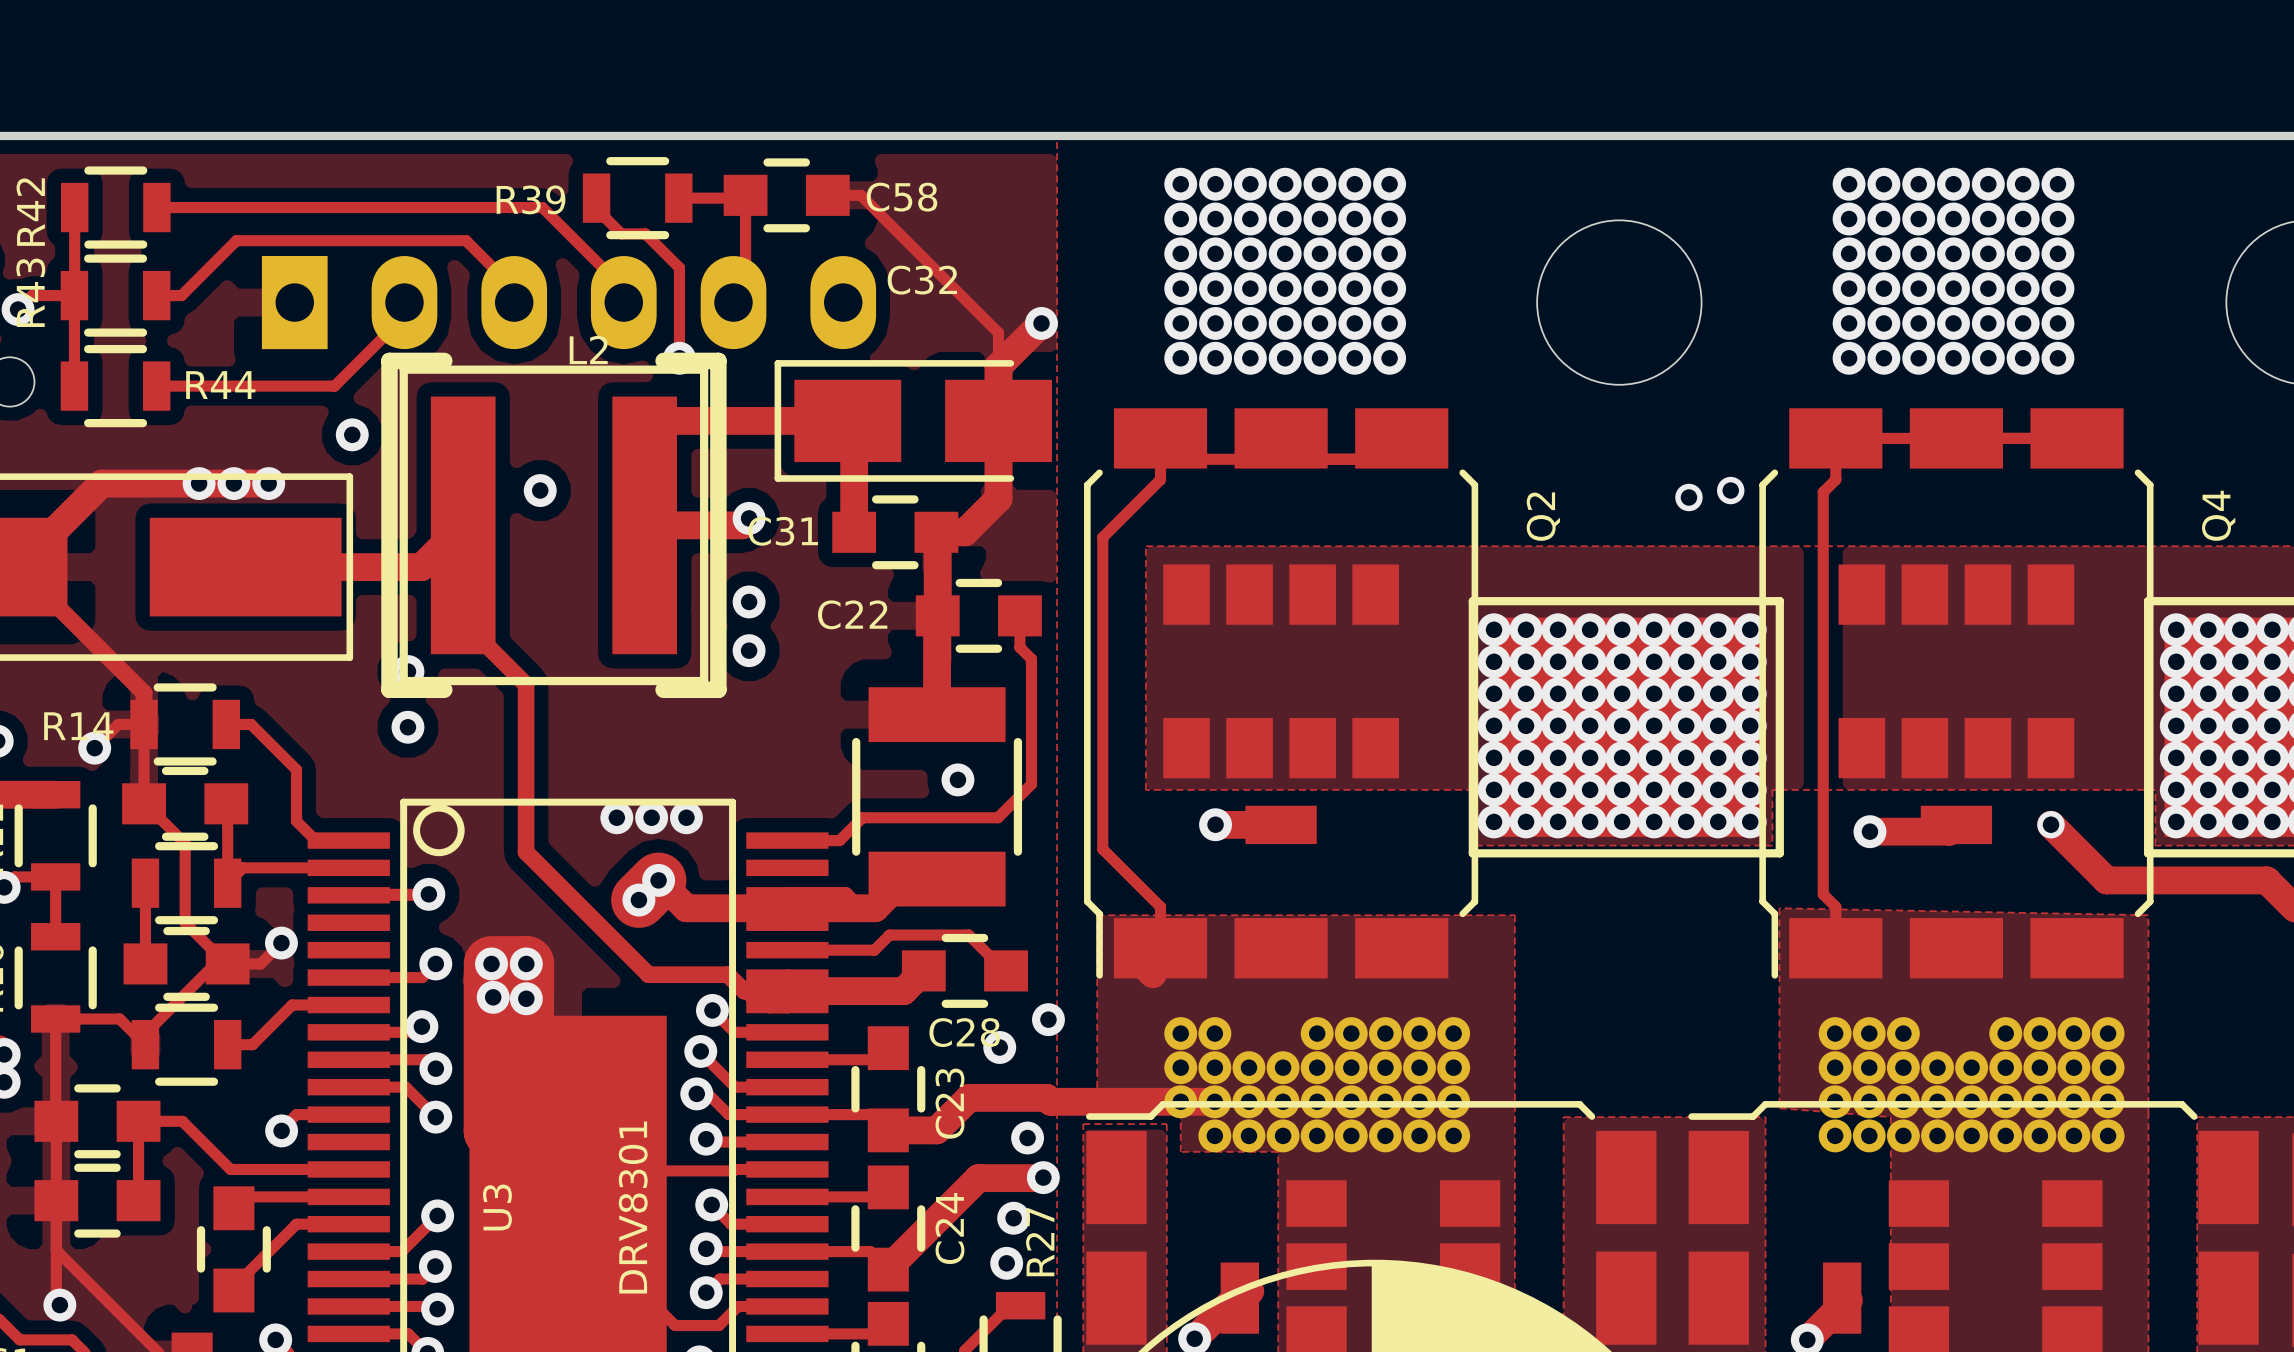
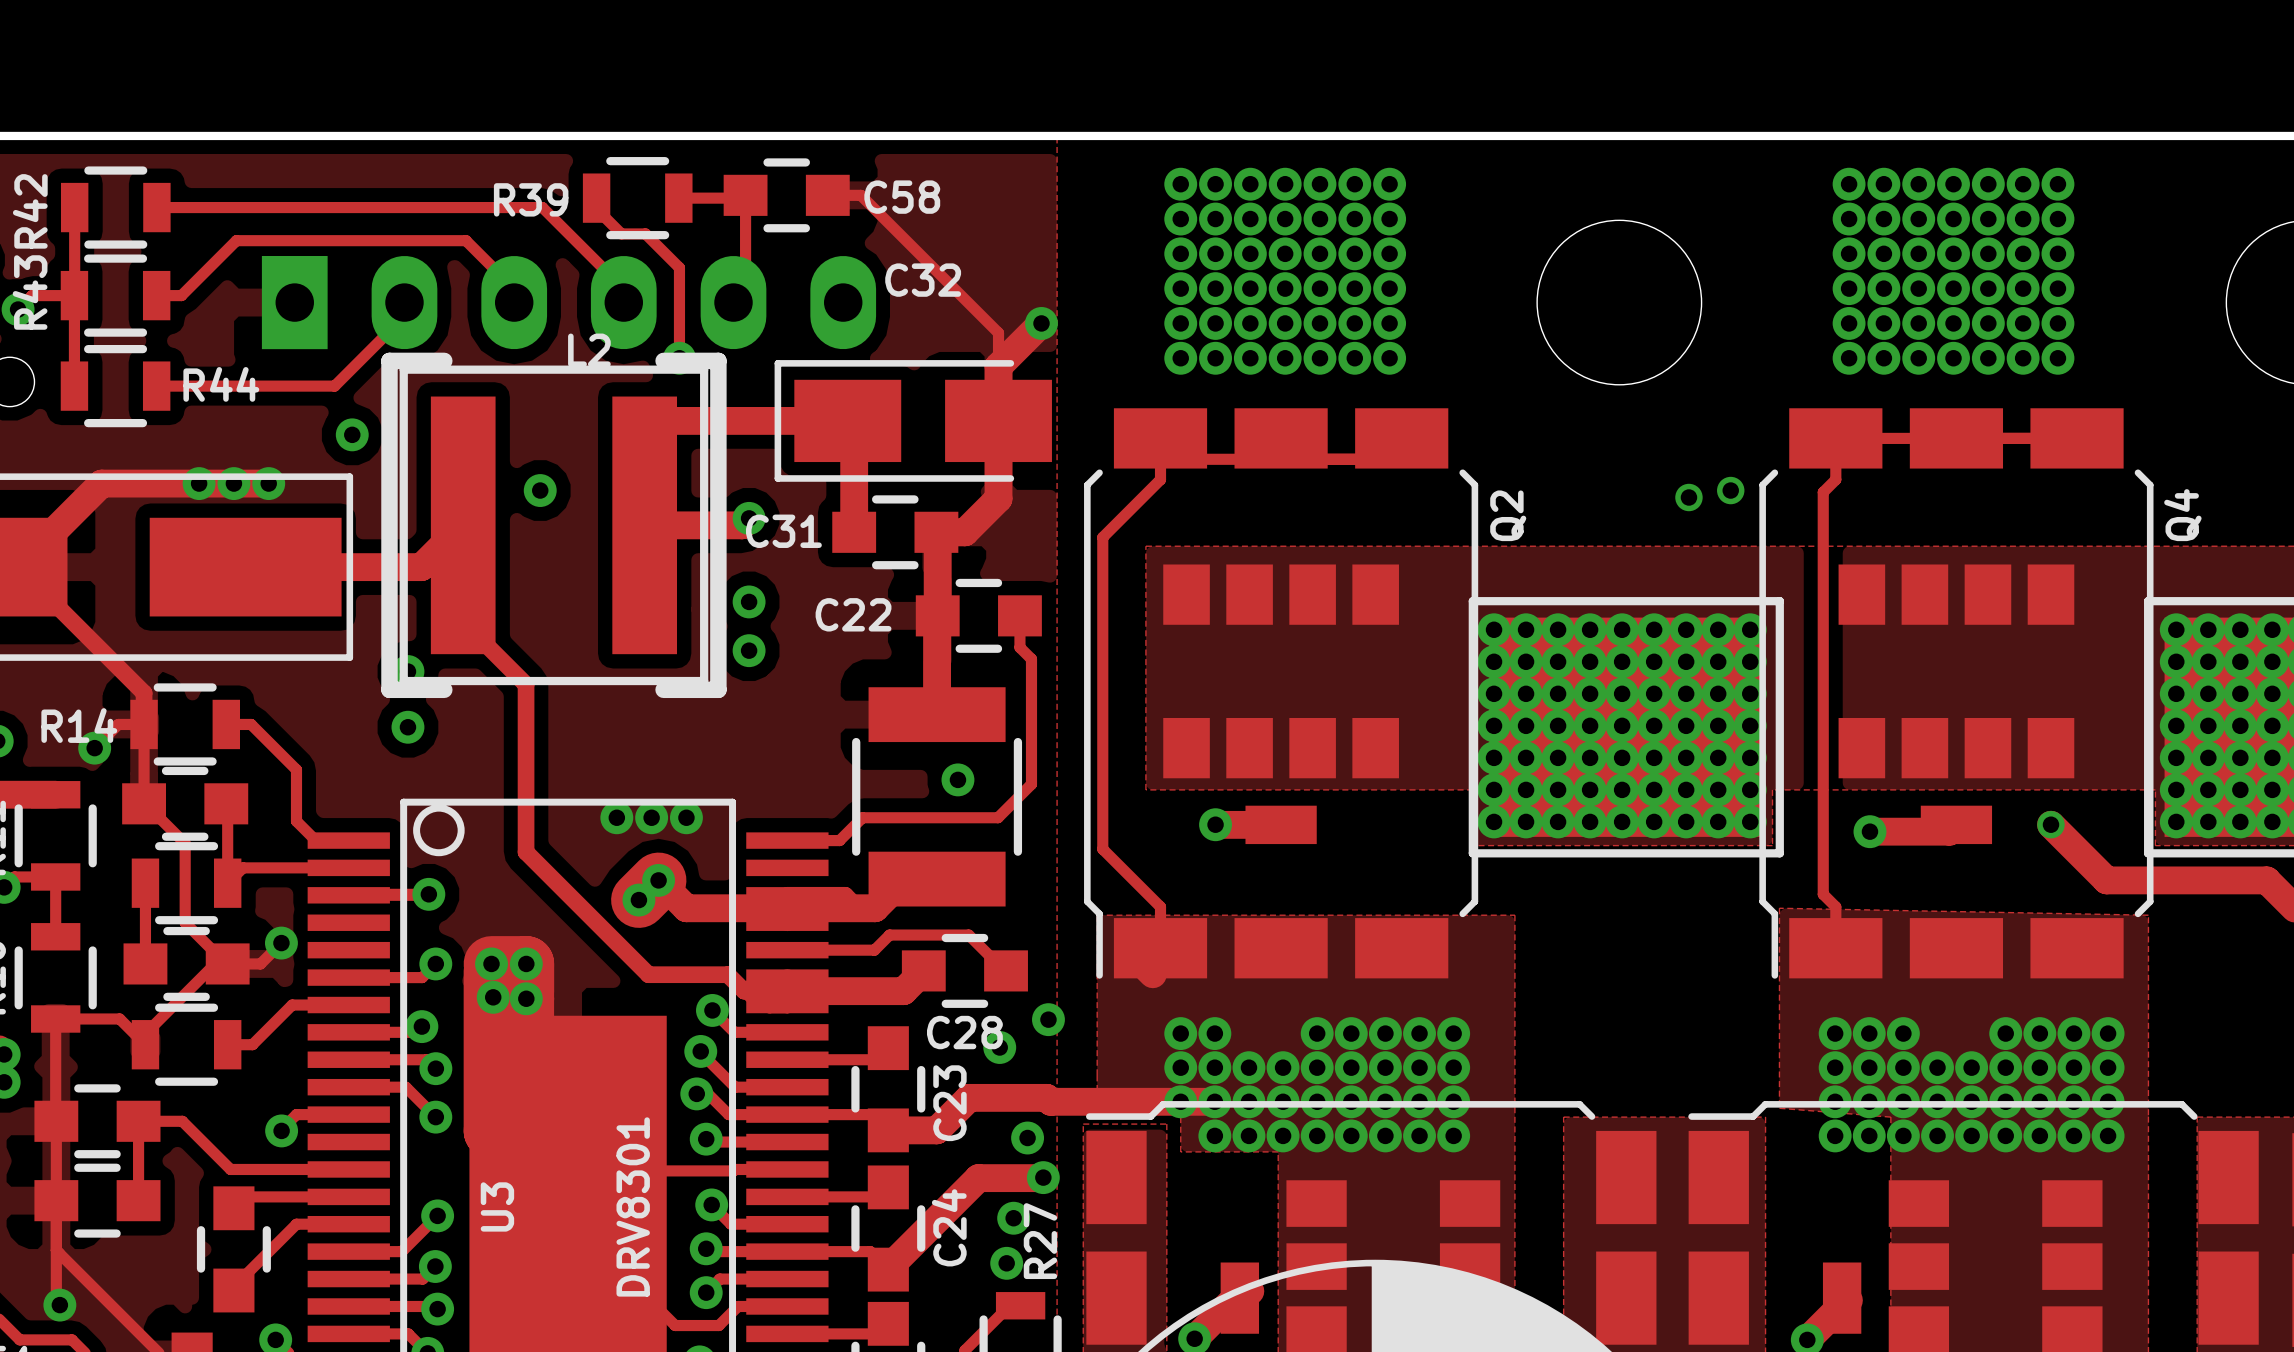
Q4 name position: Q4 (2218, 515) -> Q4 (2182, 515)
Q2 name position: Q2 (1543, 516) -> Q2 (1508, 515)

